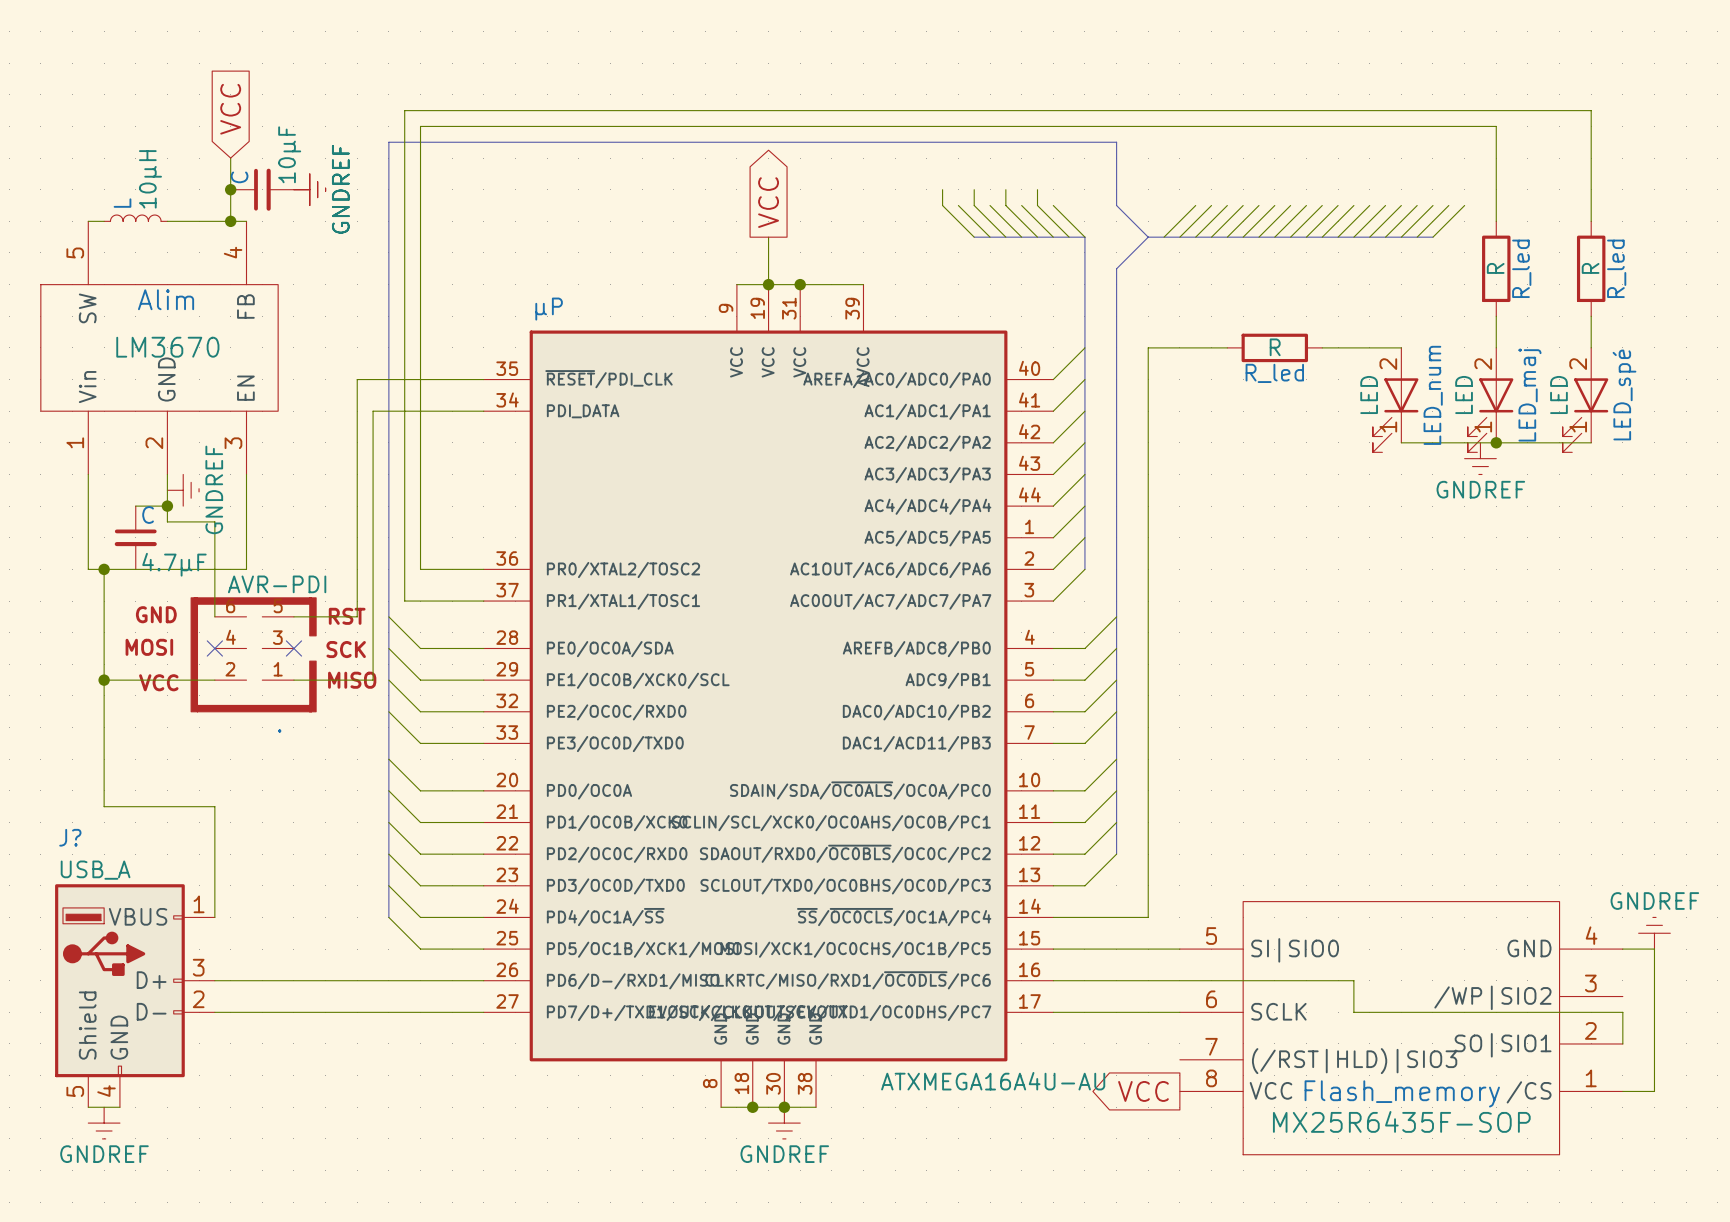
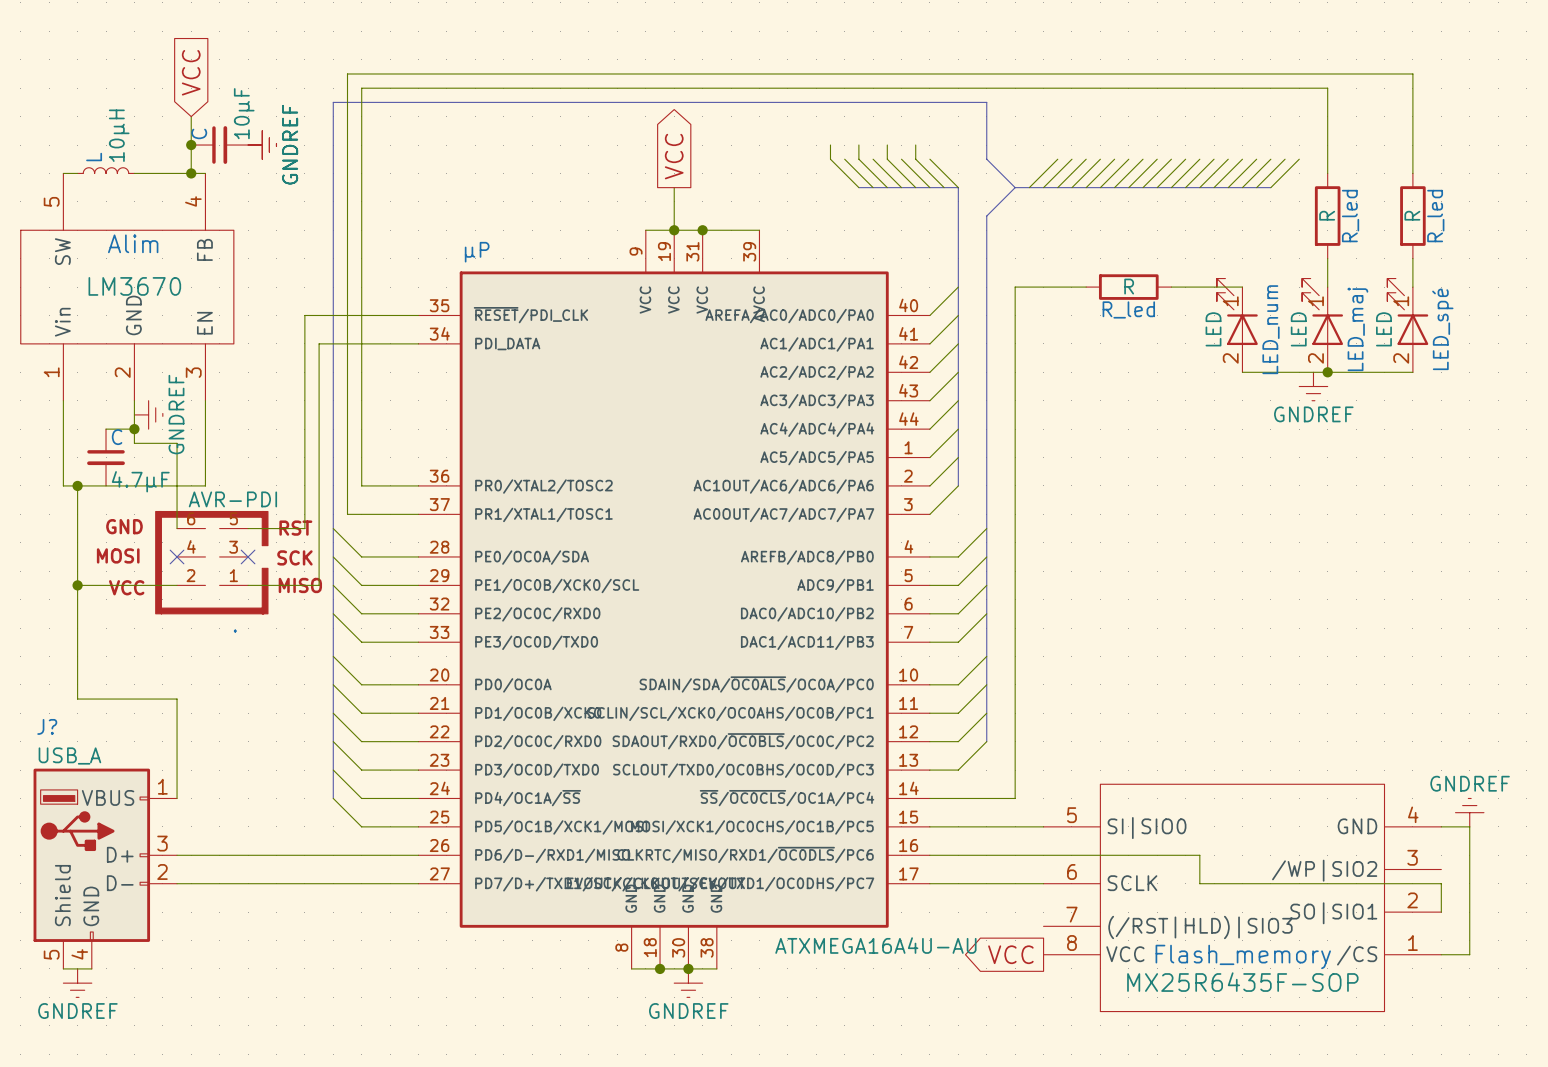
LED_num flip: as is (1395, 415) -> up-down (1237, 311)
LED_maj flip: as is (1490, 415) -> up-down (1322, 311)
LED_spé flip: as is (1585, 415) -> up-down (1407, 311)

